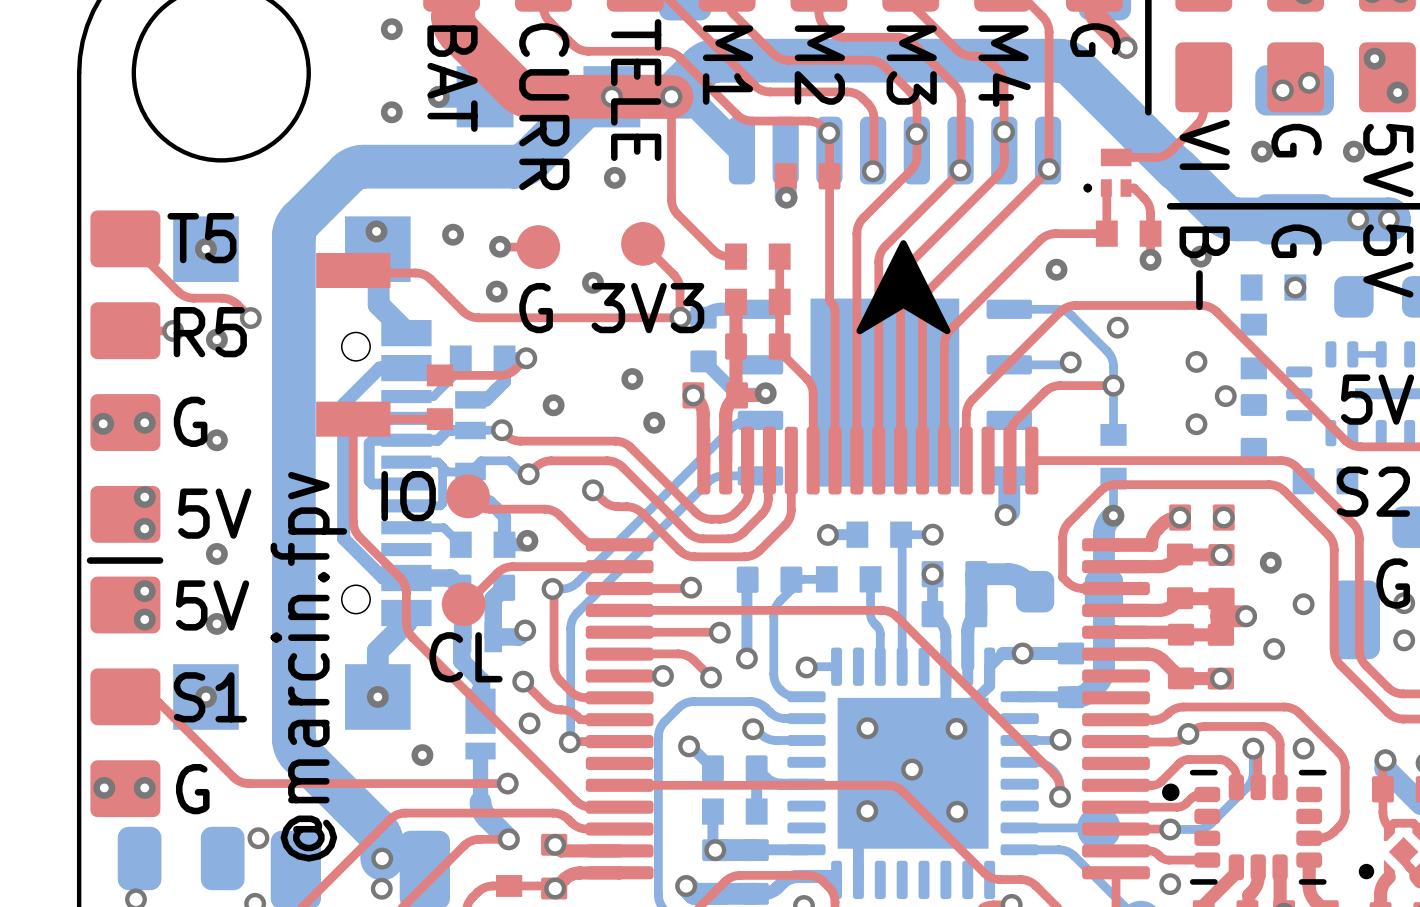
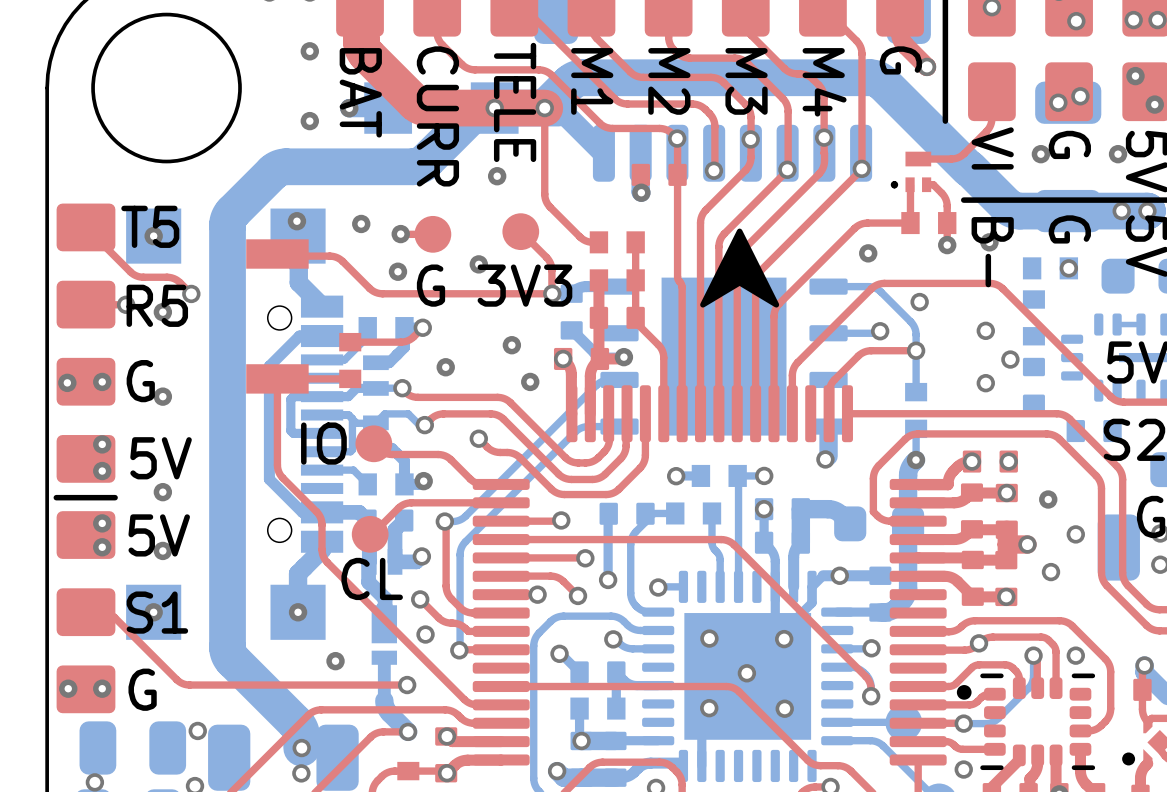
text: @marcin.fpv (308, 666) -> none

